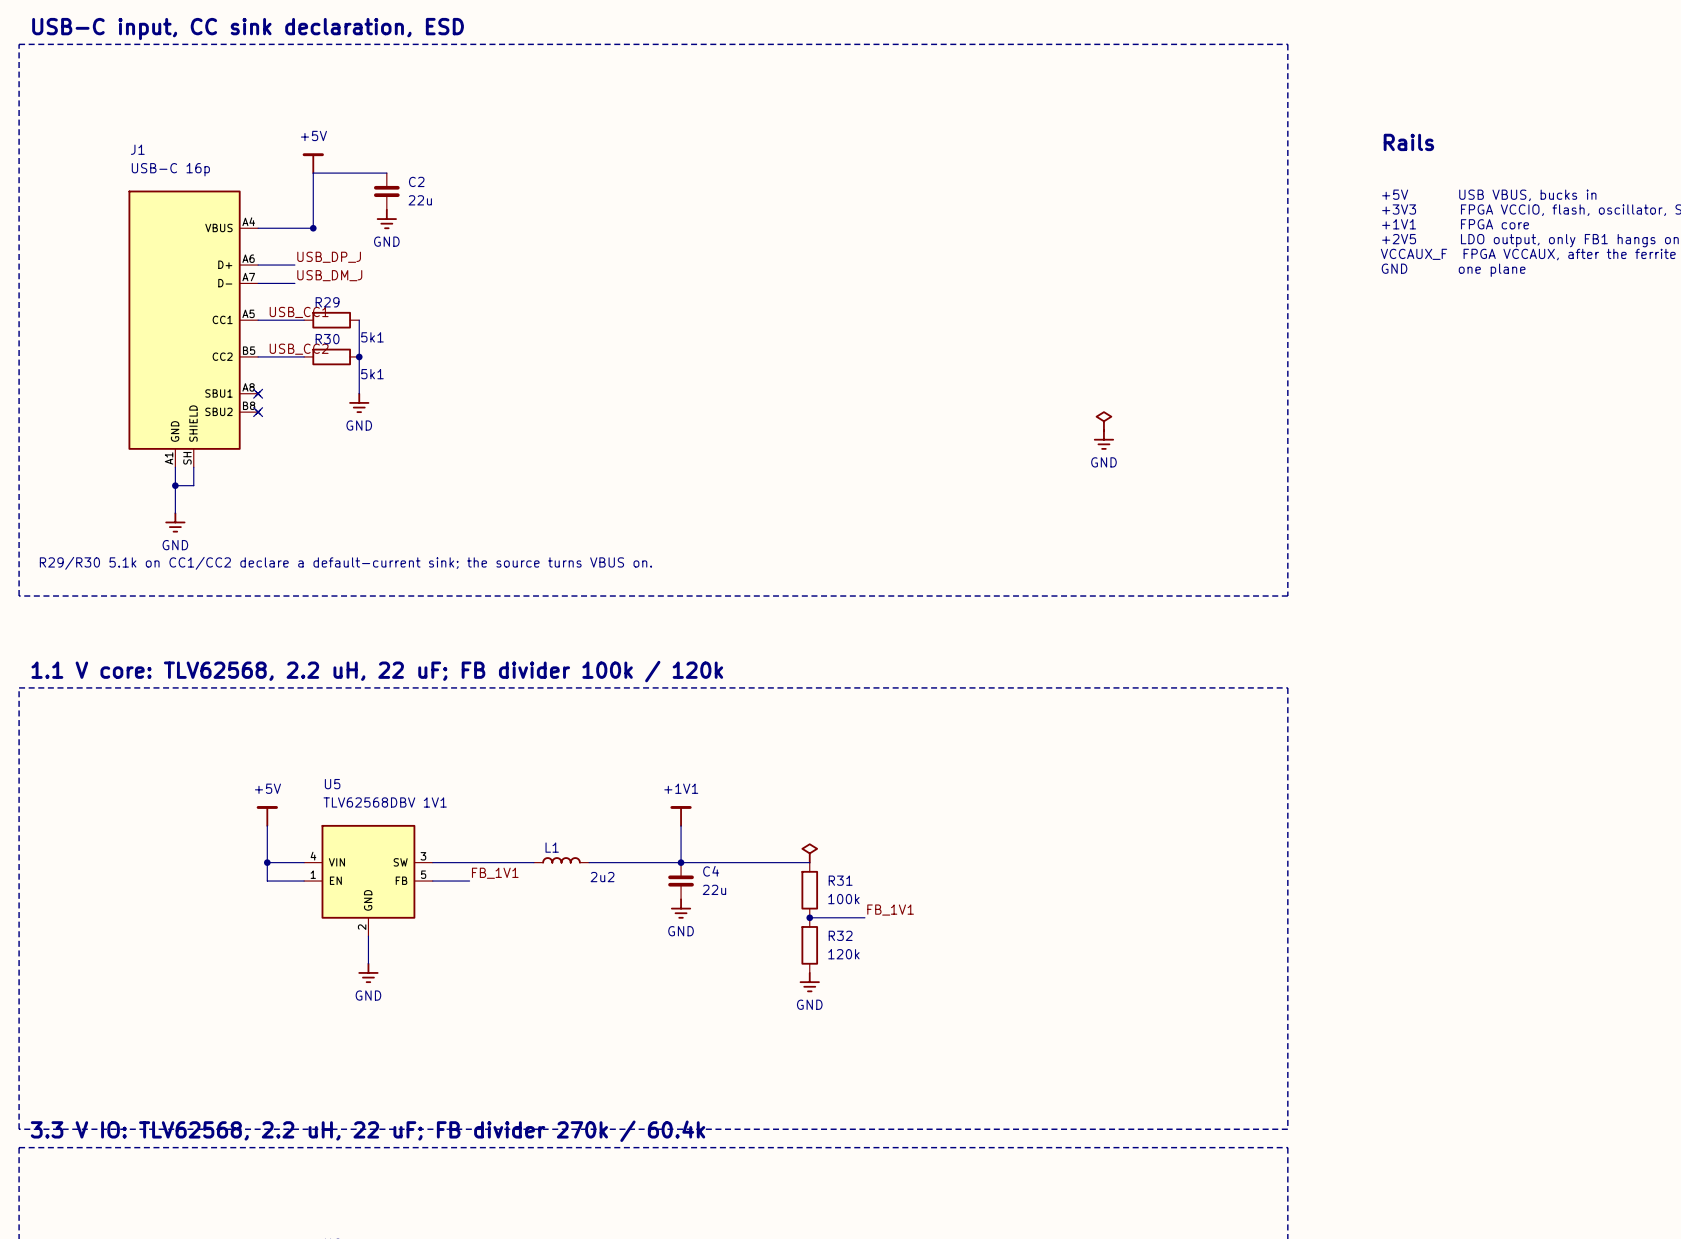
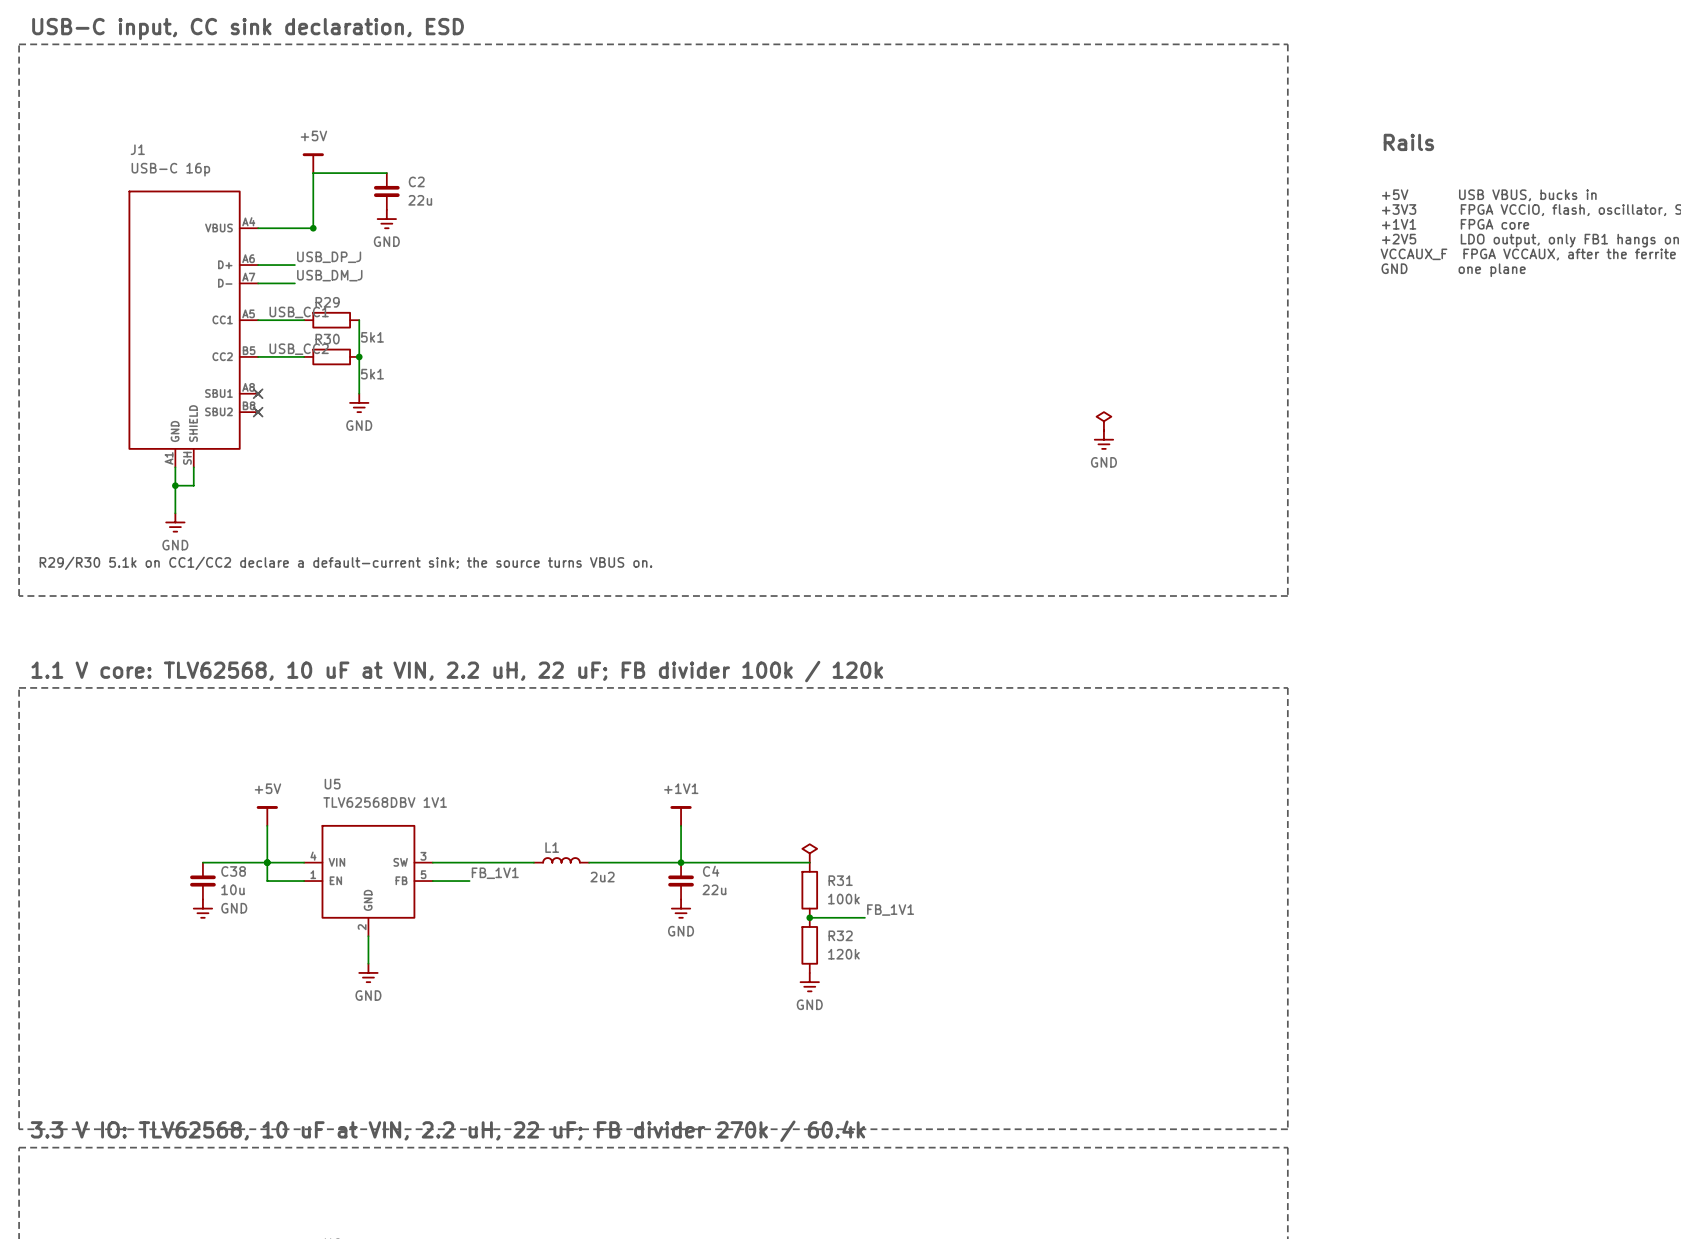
text: 1.1 V core: TLV62568, 2.2 uH, 22 uF; FB divider 100k / 120k (377, 671) -> 1.1 V core: TLV62568, 10 uF at VIN, 2.2 uH, 22 uF; FB divider 100k / 120k (457, 671)
wire: none -> (202, 862) (267, 862)
C38: none -> 10u (202, 881)
power symbol: none -> GND (202, 908)
text: 3.3 V IO: TLV62568, 2.2 uH, 22 uF; FB divider 270k / 60.4k (368, 1131) -> 3.3 V IO: TLV62568, 10 uF at VIN, 2.2 uH, 22 uF; FB divider 270k / 60.4k (447, 1131)

